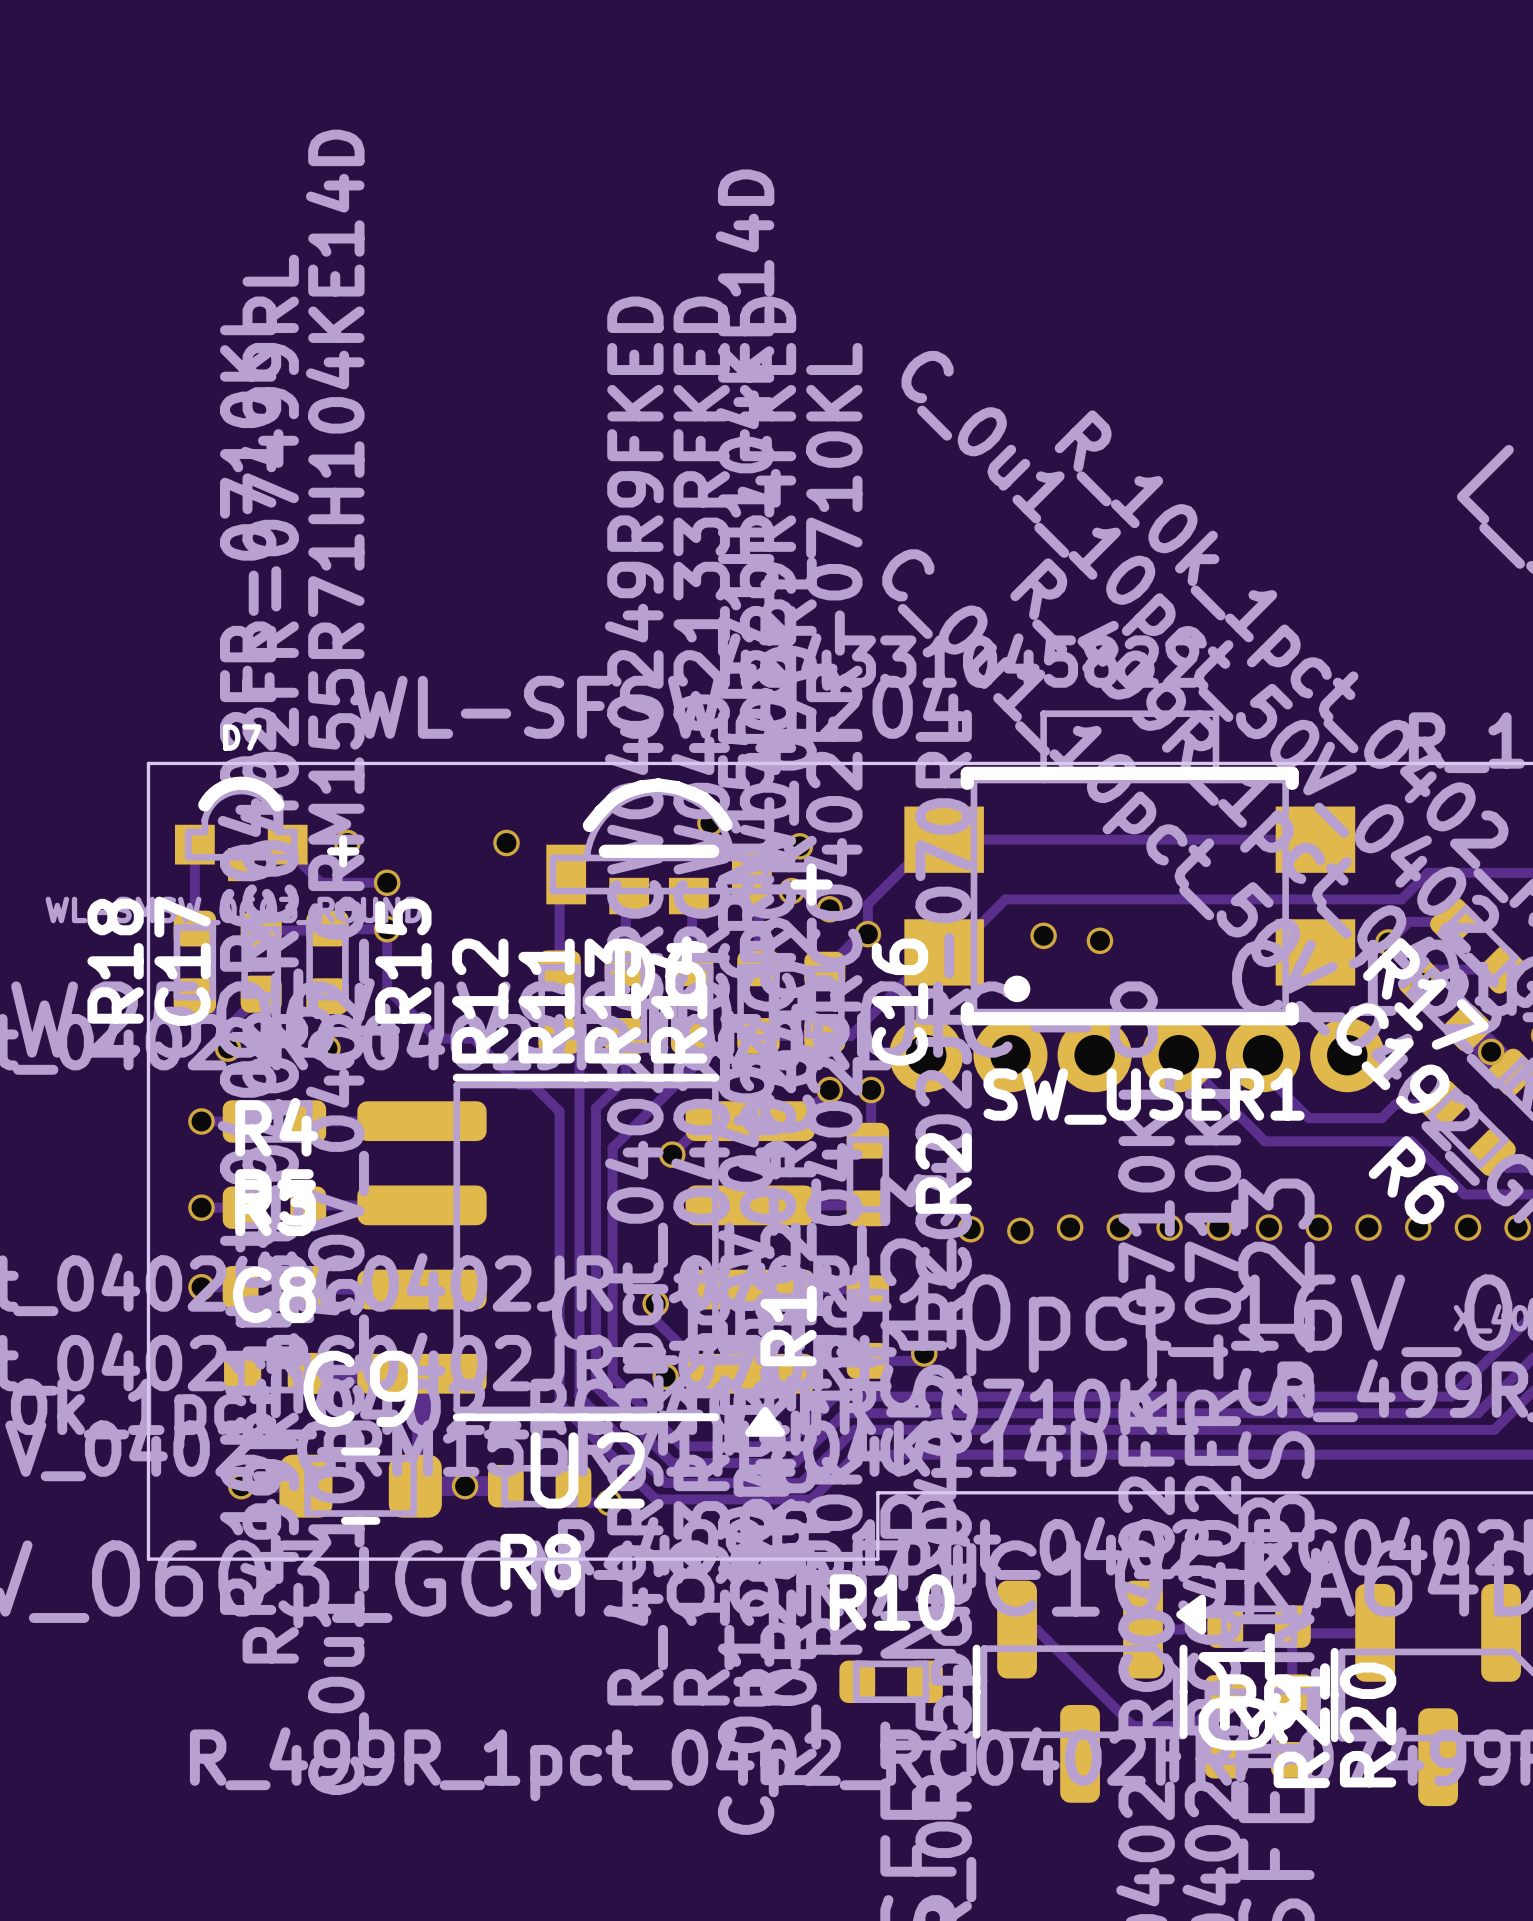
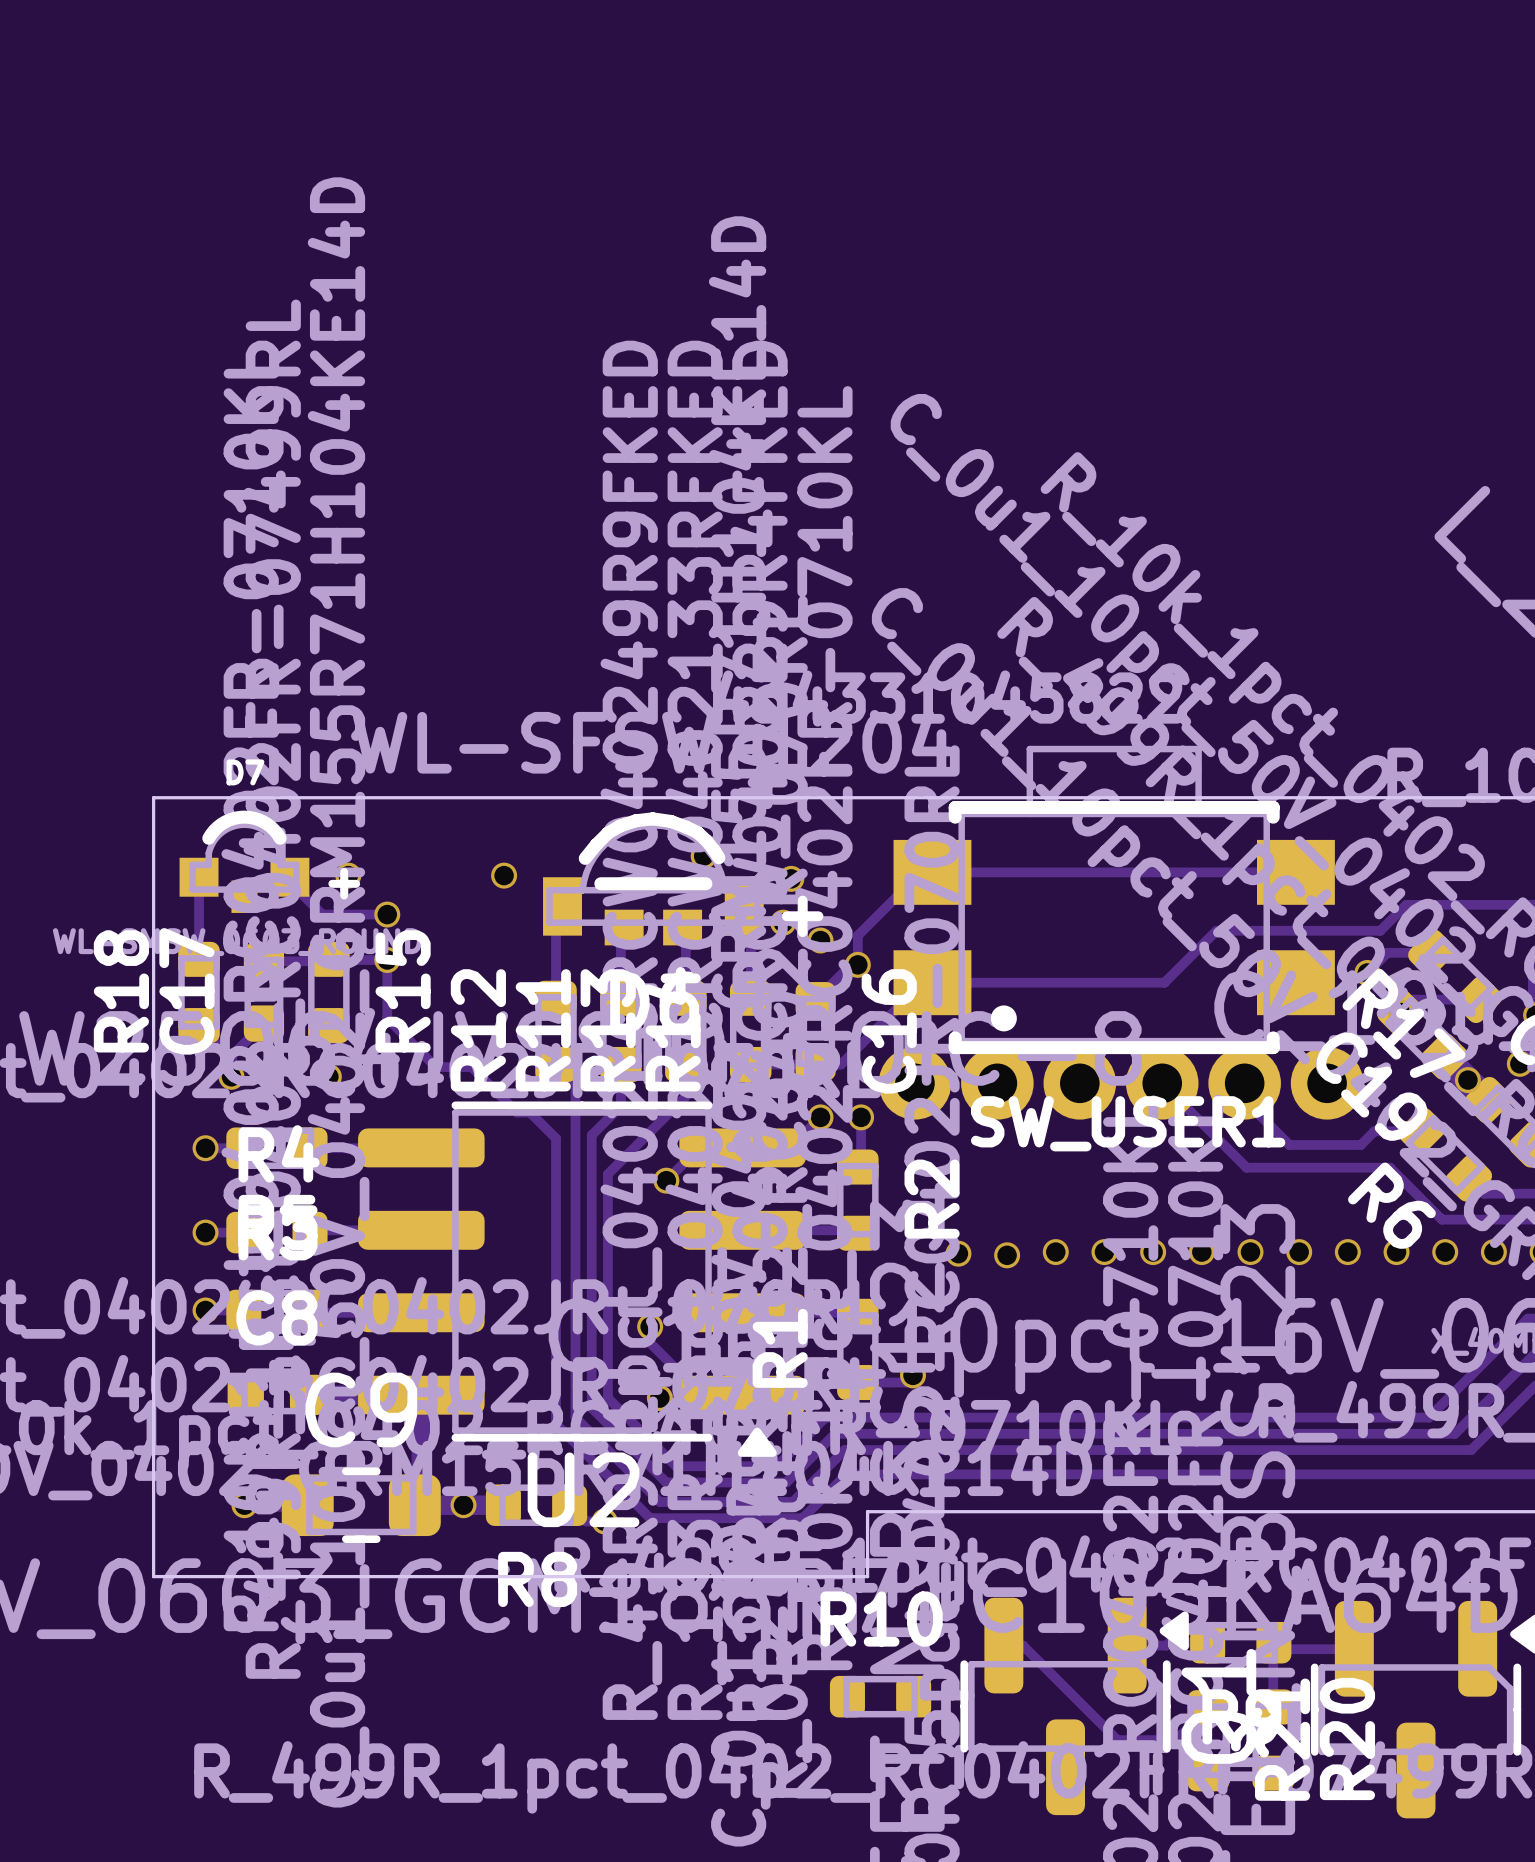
track: (1234, 899) (1005, 899) (952, 952) -> (1216, 930) (1164, 982) (940, 982)
via: (1043, 935) -> none
via: (1099, 940) -> none

